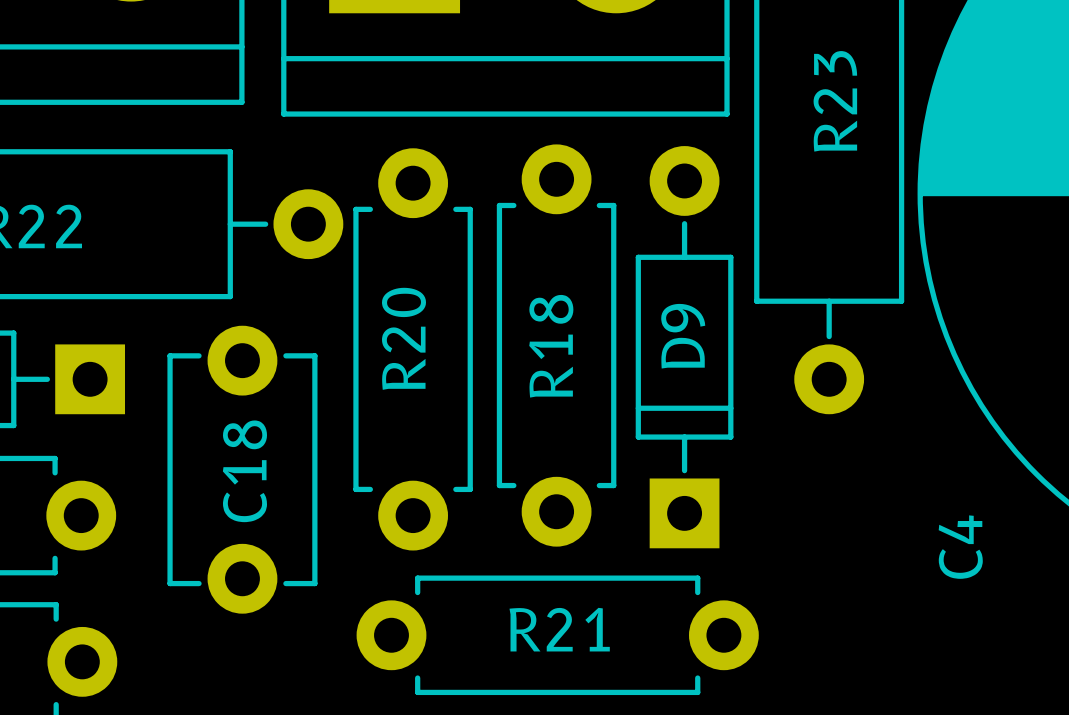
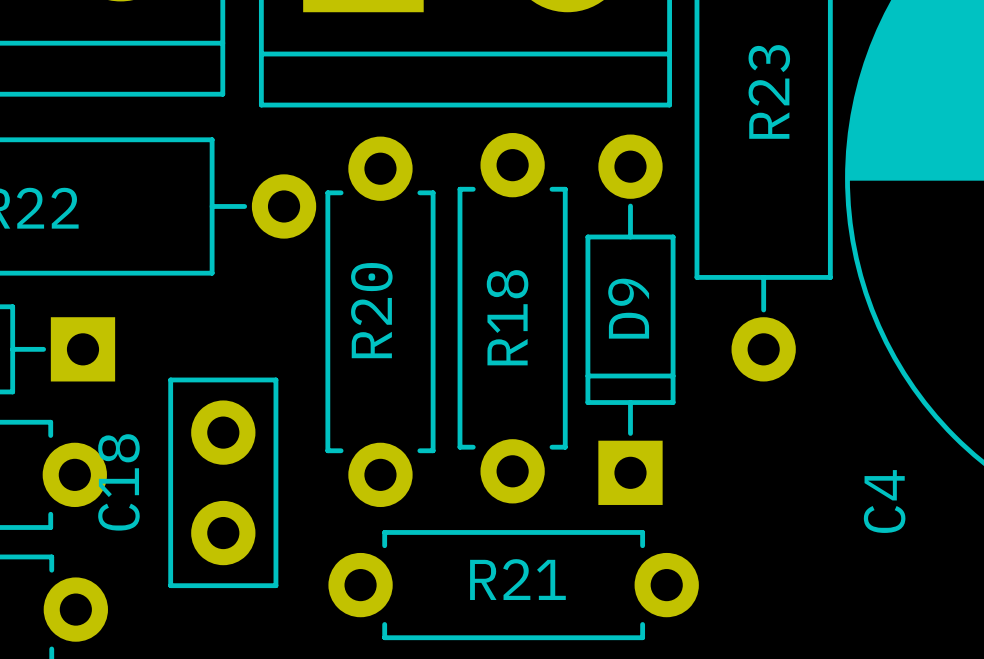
C18 footprint: [167, 325, 318, 614] -> [168, 377, 279, 589]
C18 name position: C18 (244, 471) -> C18 (118, 482)

